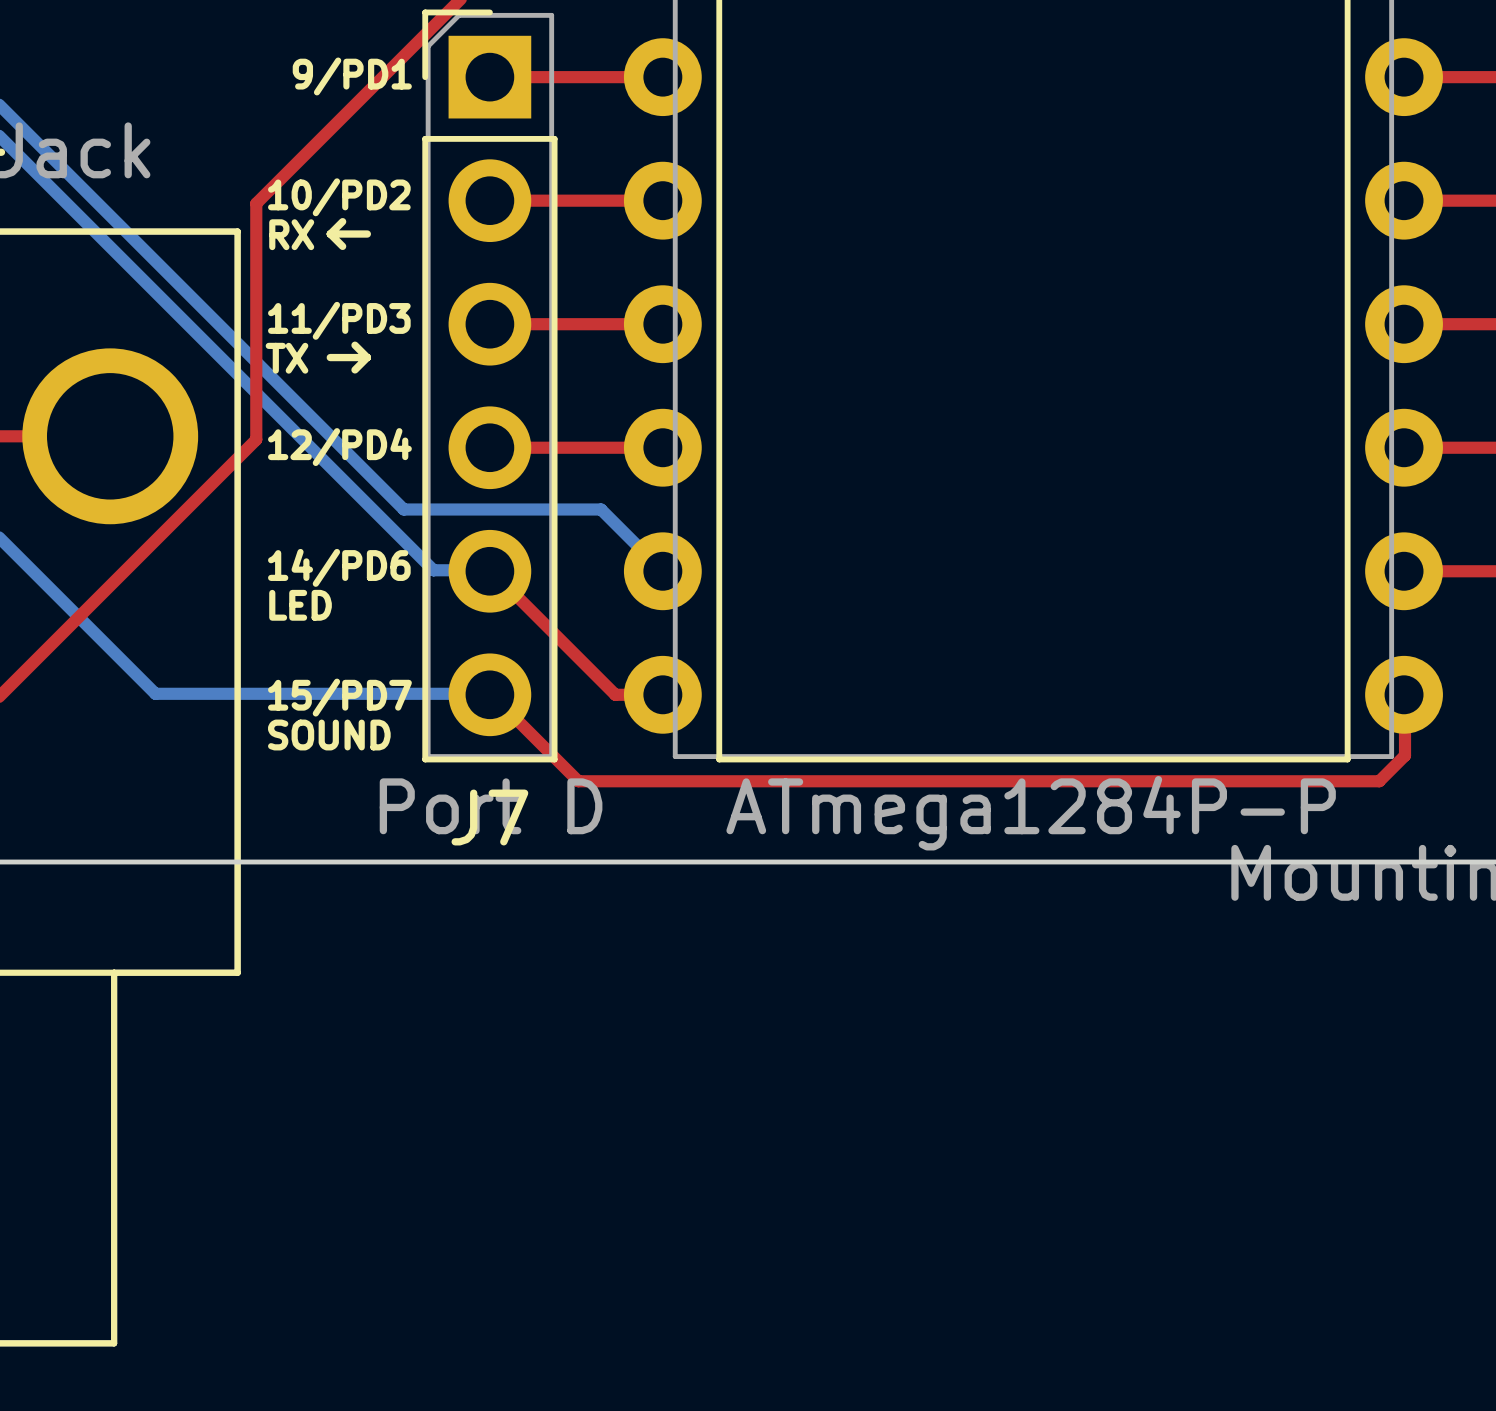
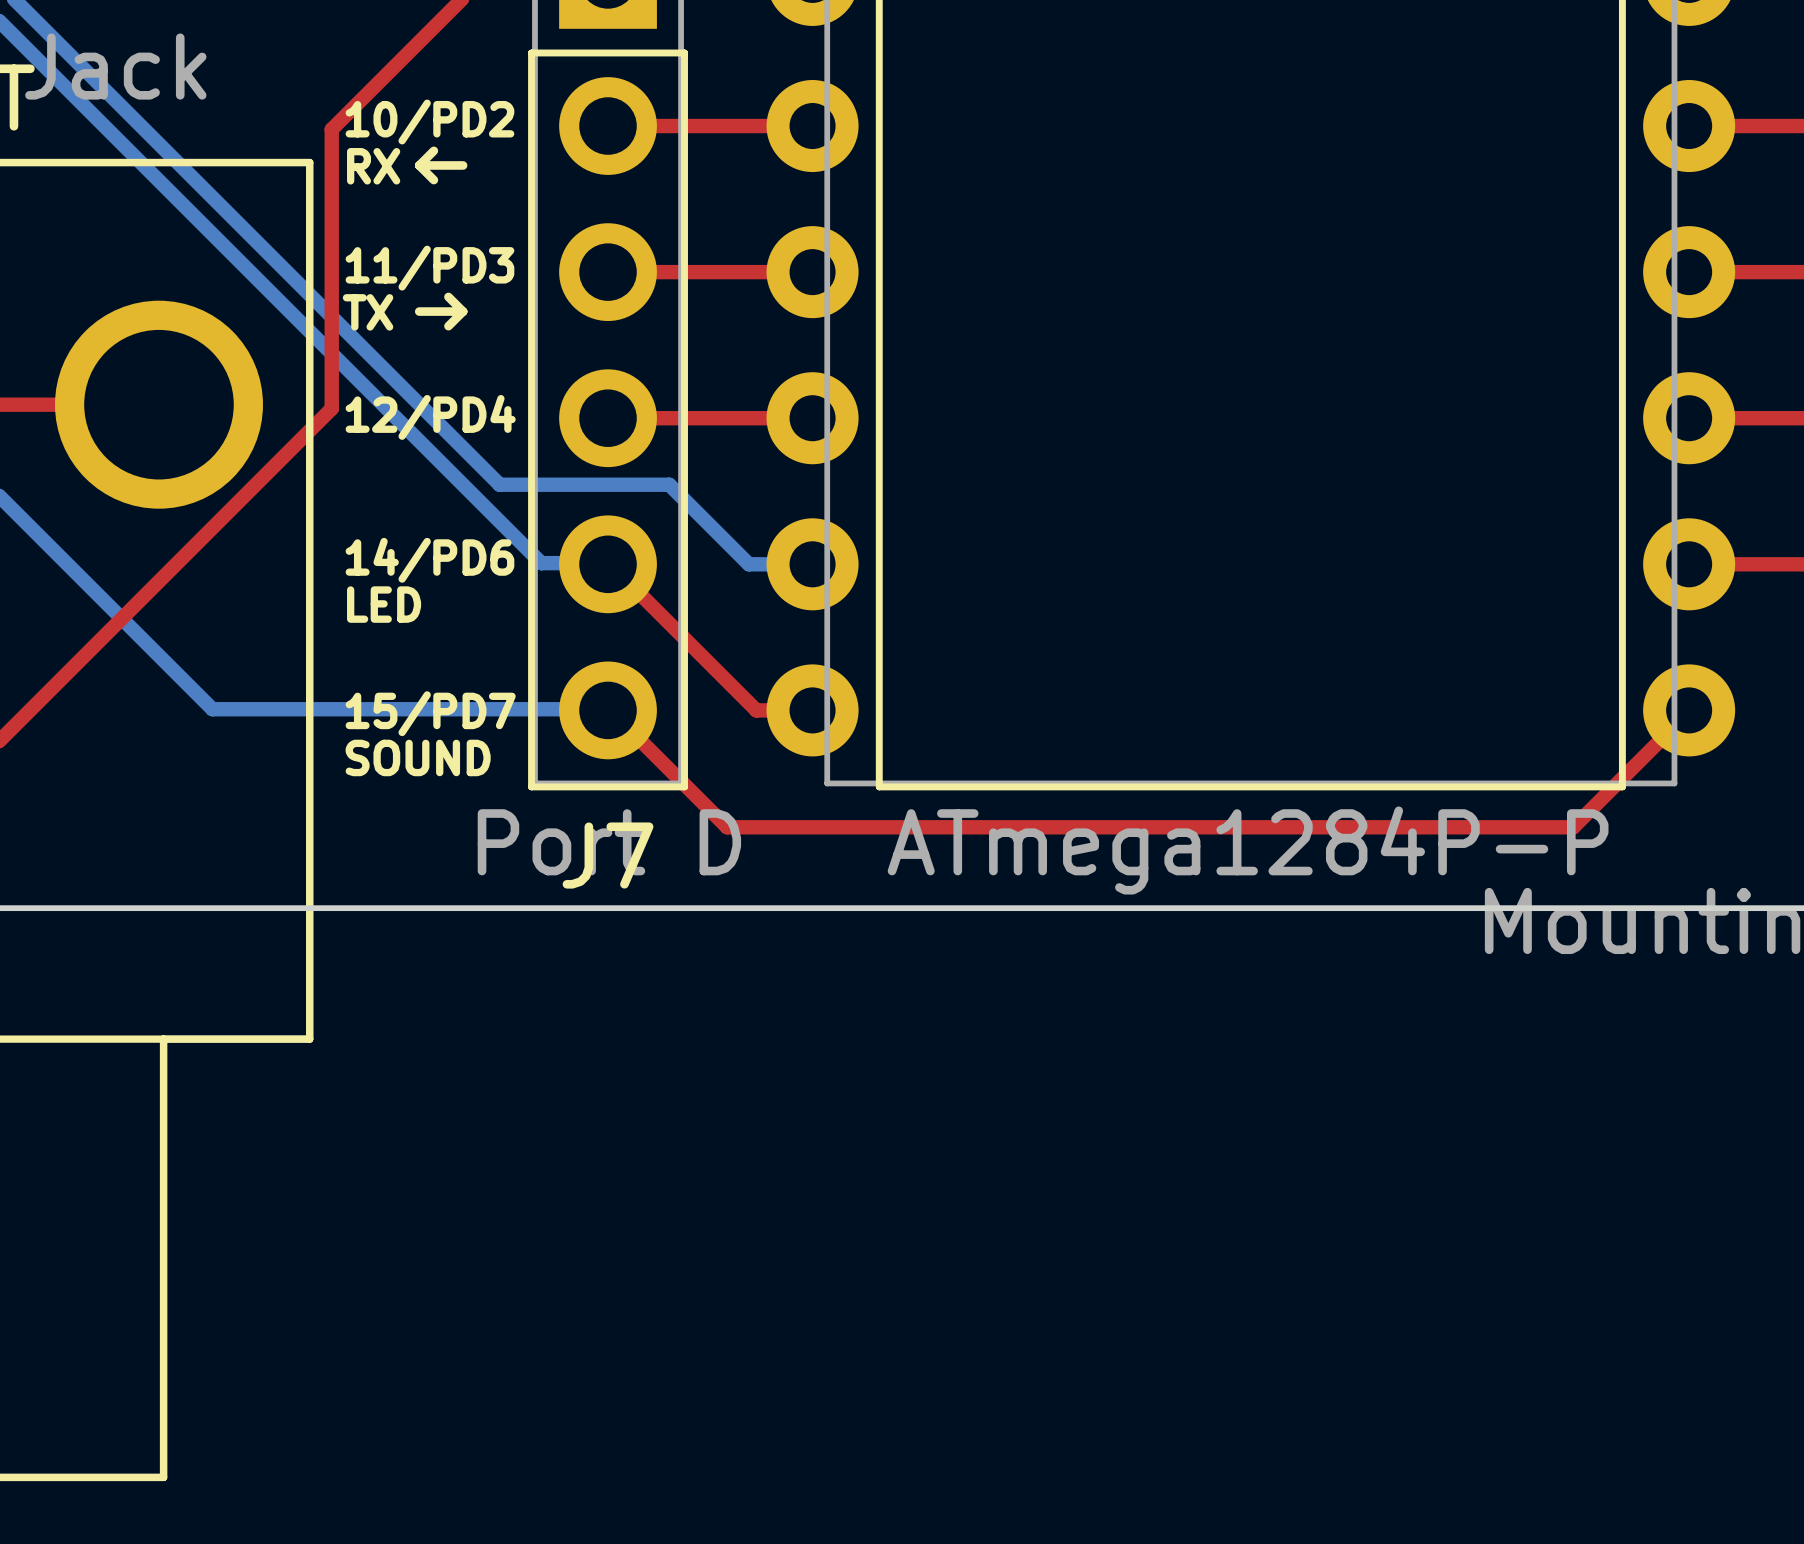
bottom track: (398, 503) (403, 509) (601, 509) (662, 571) -> (499, 484) (669, 484) (748, 564) (812, 564)
top track: (1405, 694) (1405, 755) (1379, 781) (578, 781) -> (1690, 710) (1573, 827) (727, 827) (712, 812)

